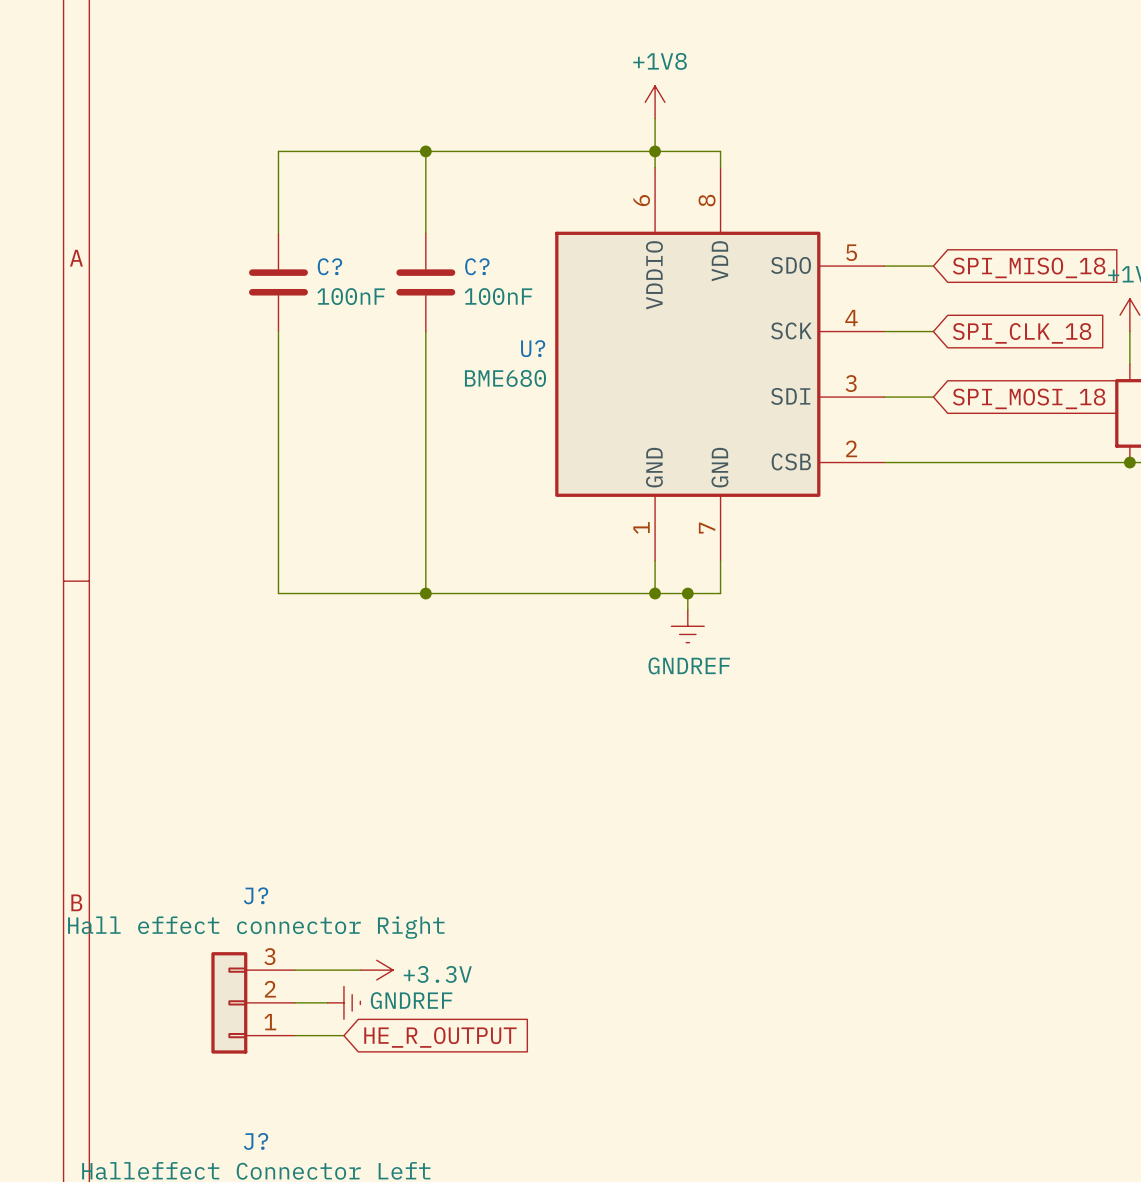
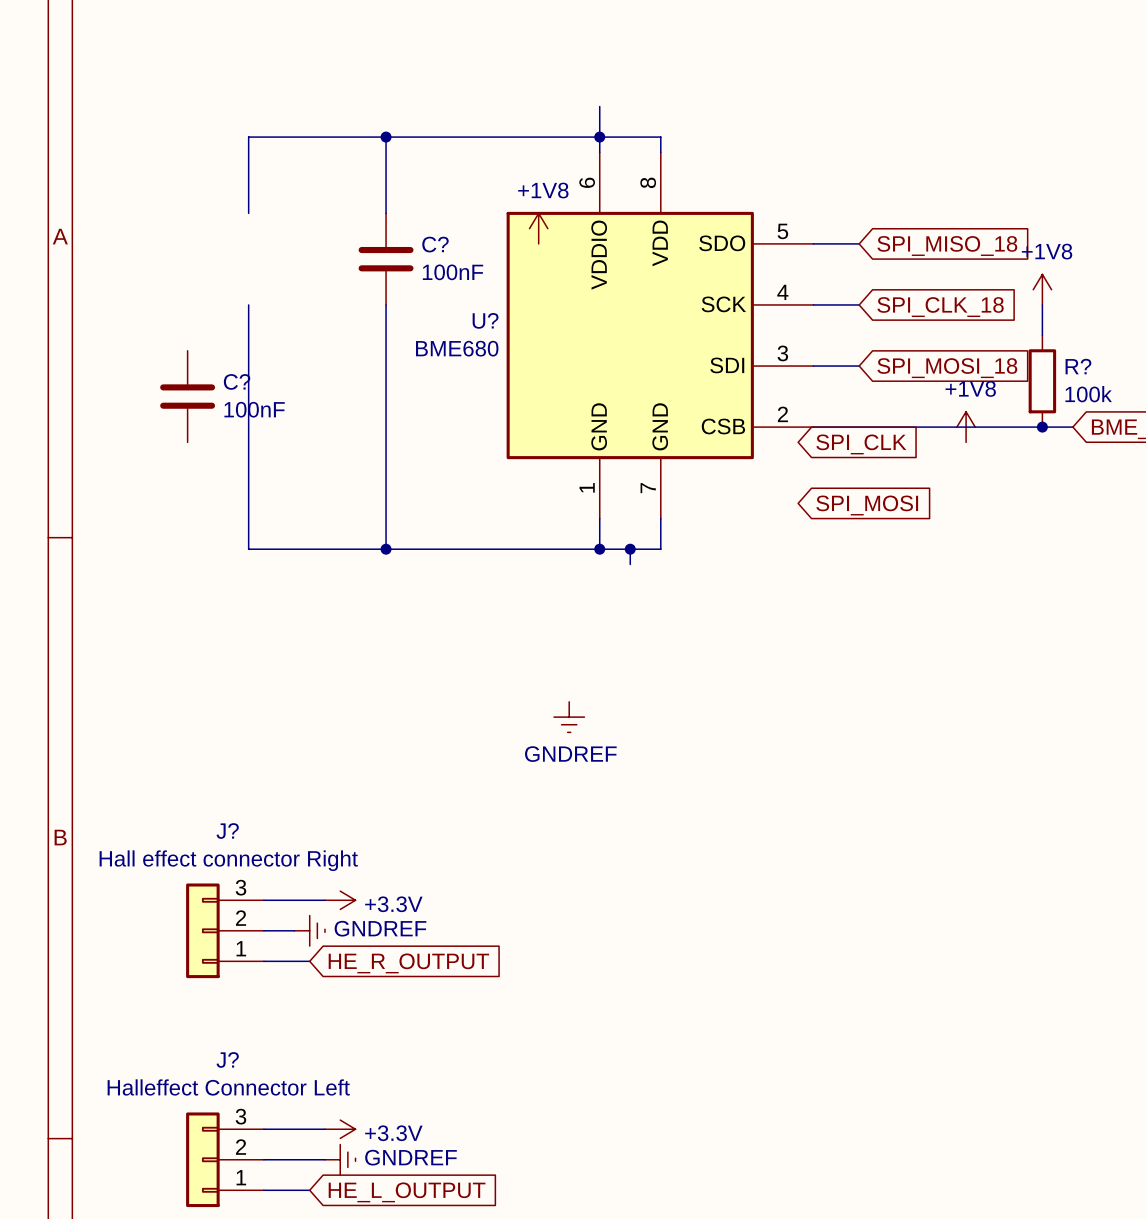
power symbol position: +1V8 (655, 102) -> +1V8 (538, 228)
C? position: (278, 282) -> (187, 396)
power symbol: none -> +1V8 (966, 427)
global label: none -> SPI_CLK (861, 444)
global label: none -> SPI_MOSI (867, 505)
power symbol position: GNDREF (687, 626) -> GNDREF (569, 717)

